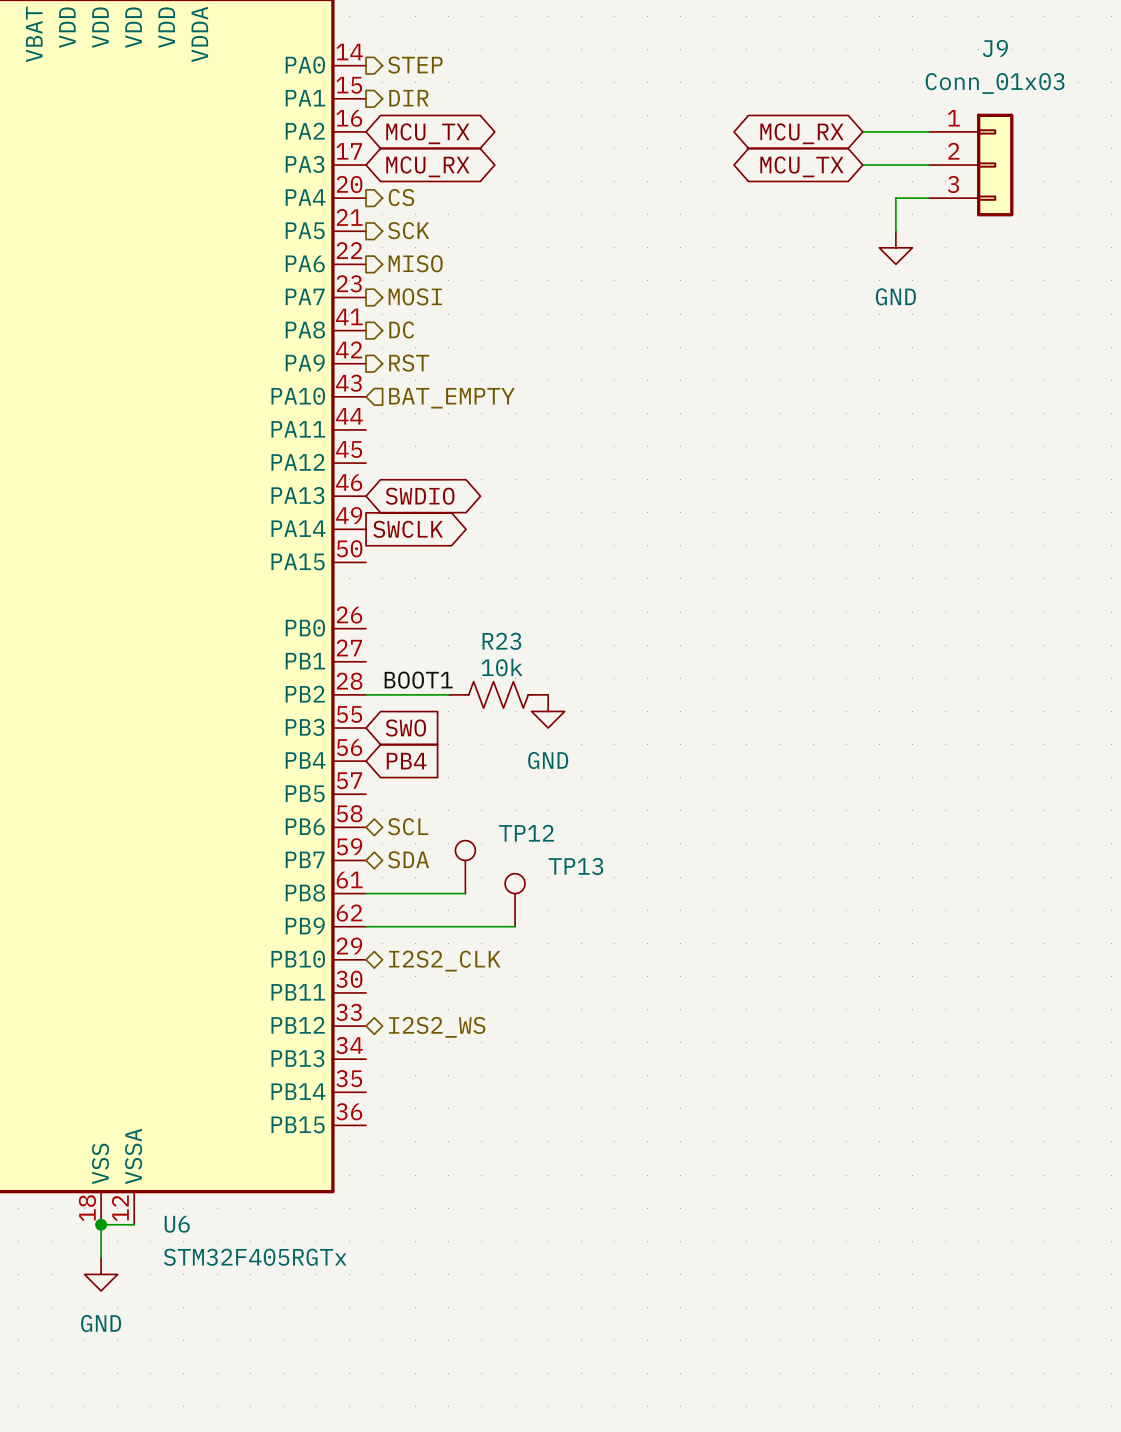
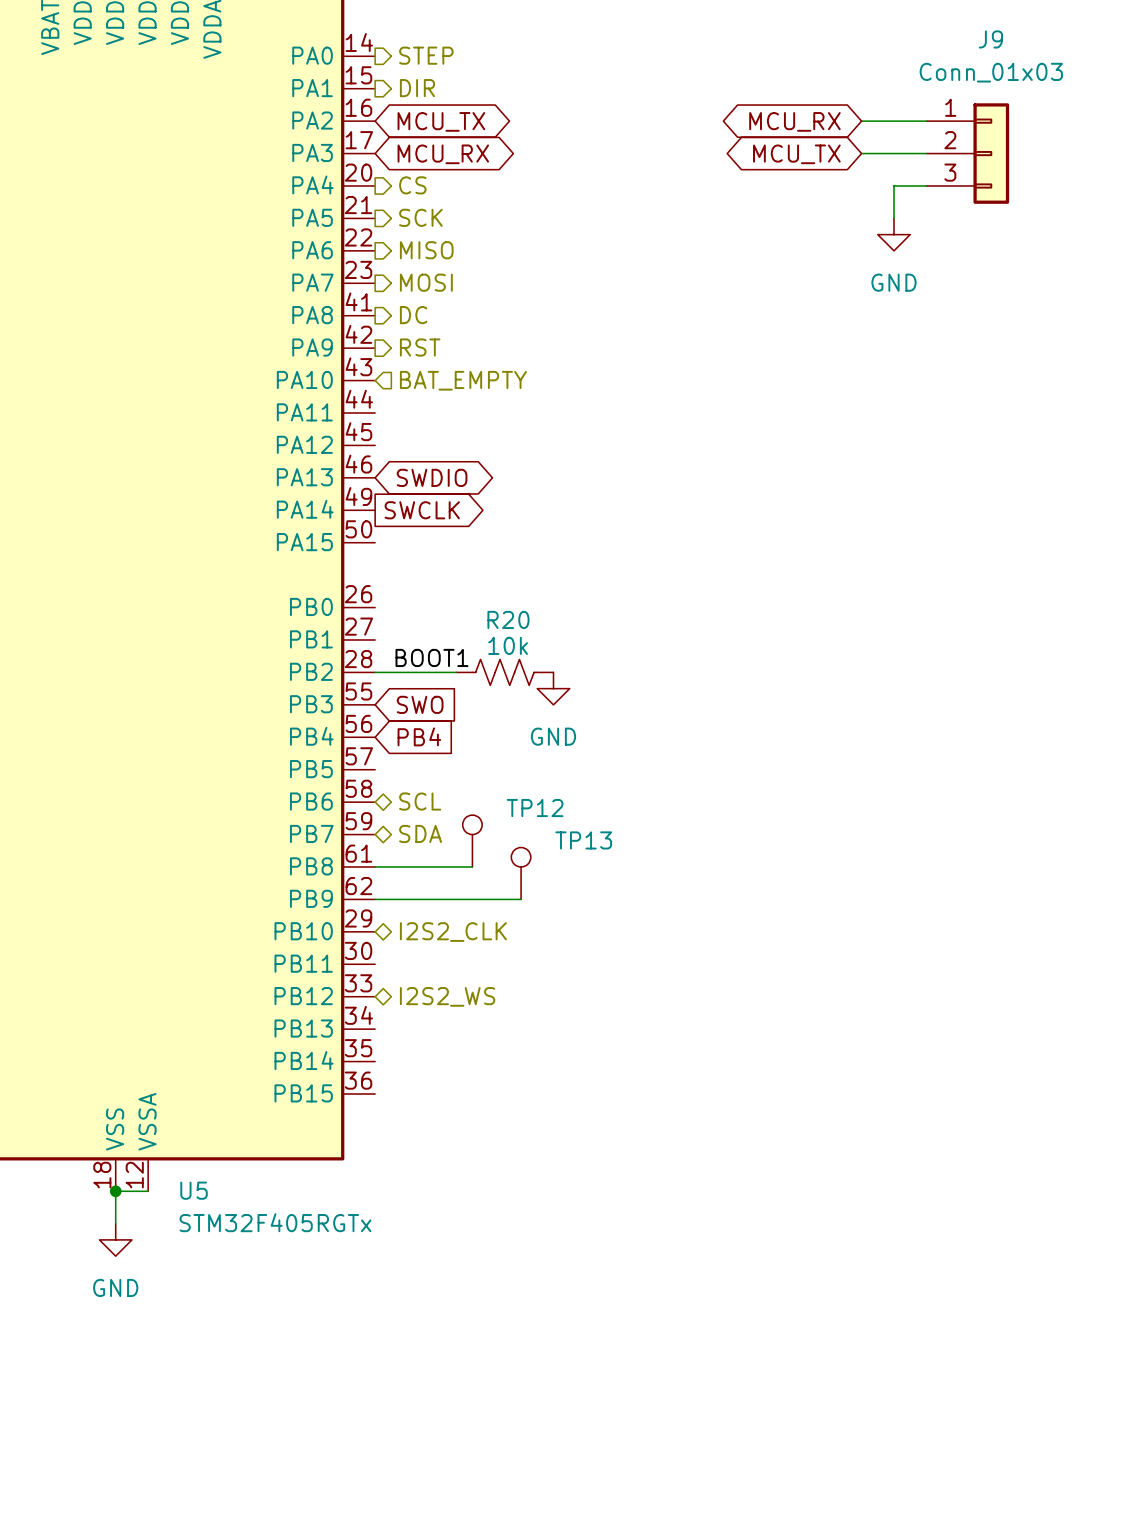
R23 name: R23 (501, 641) -> R20 (508, 619)
U6 name: U6 (177, 1224) -> U5 (194, 1190)

